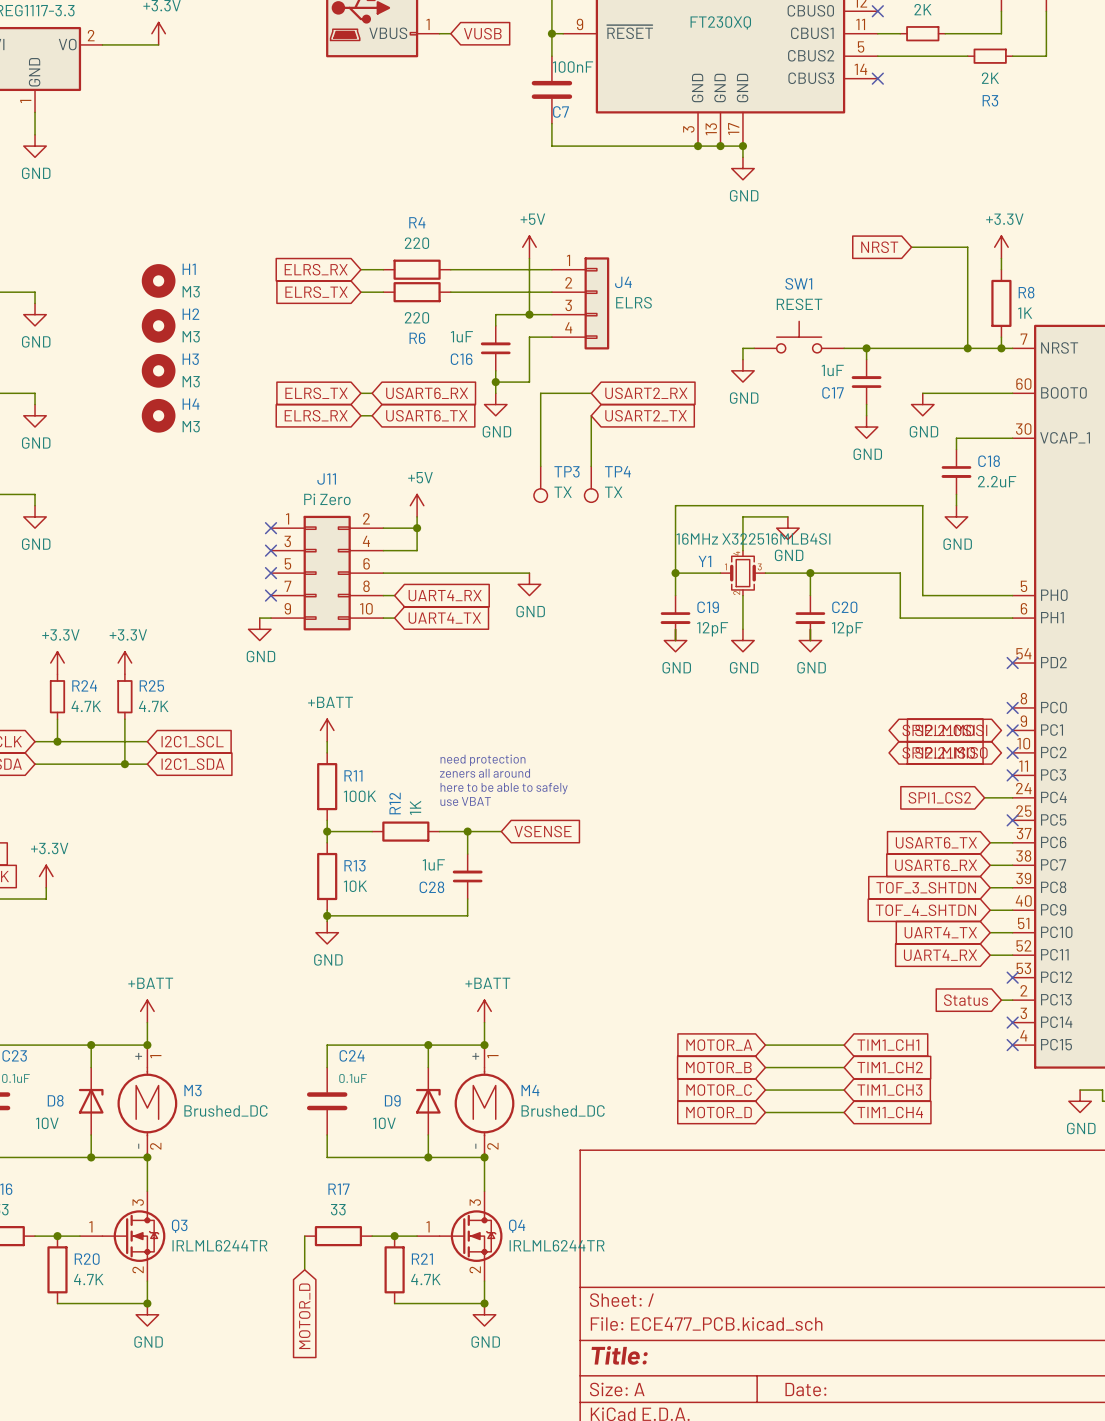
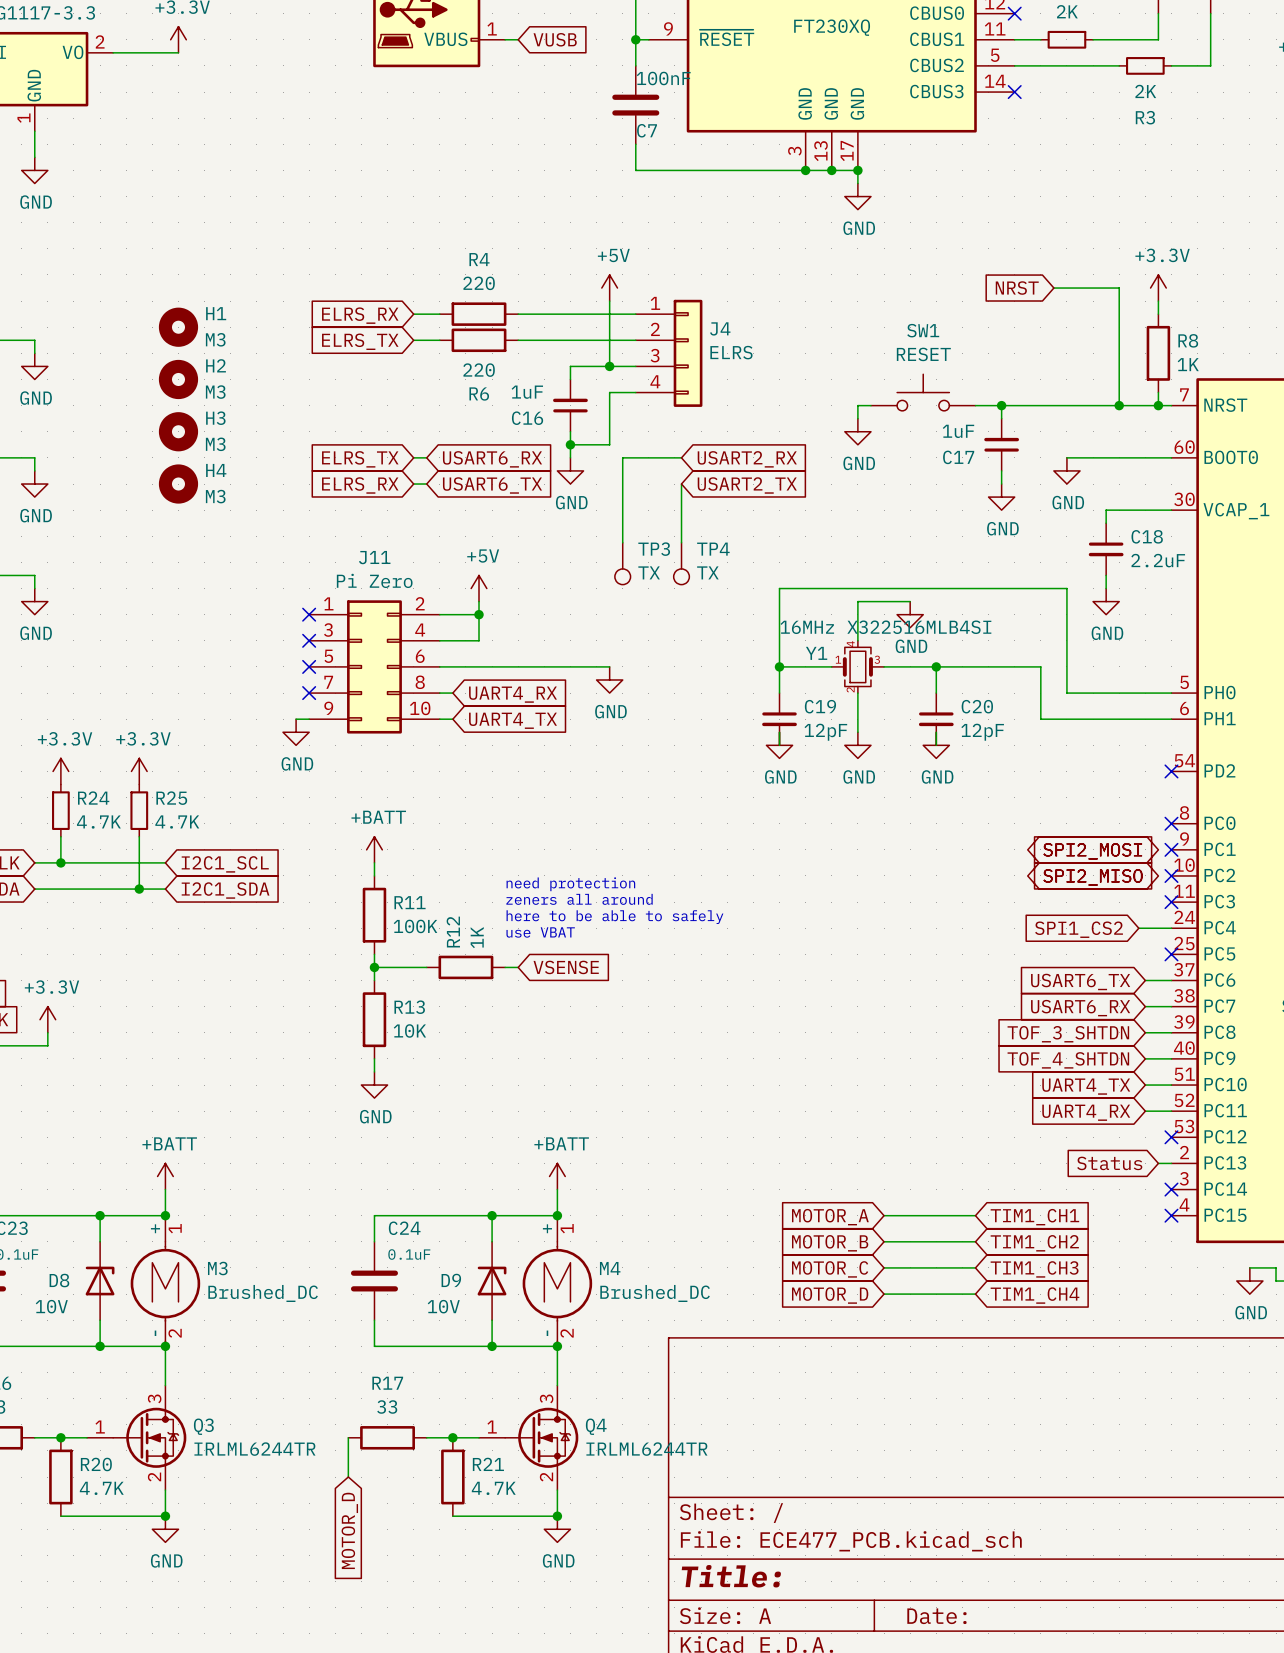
wire: (450, 831) (501, 831) -> none
wire: (467, 831) (467, 854) -> none
junction: (467, 831) -> none
global label position: VSENSE (543, 831) -> VSENSE (566, 967)
C28: 1uF (467, 876) -> none
wire: (467, 898) (467, 915) (327, 915) -> none
junction: (327, 915) -> none

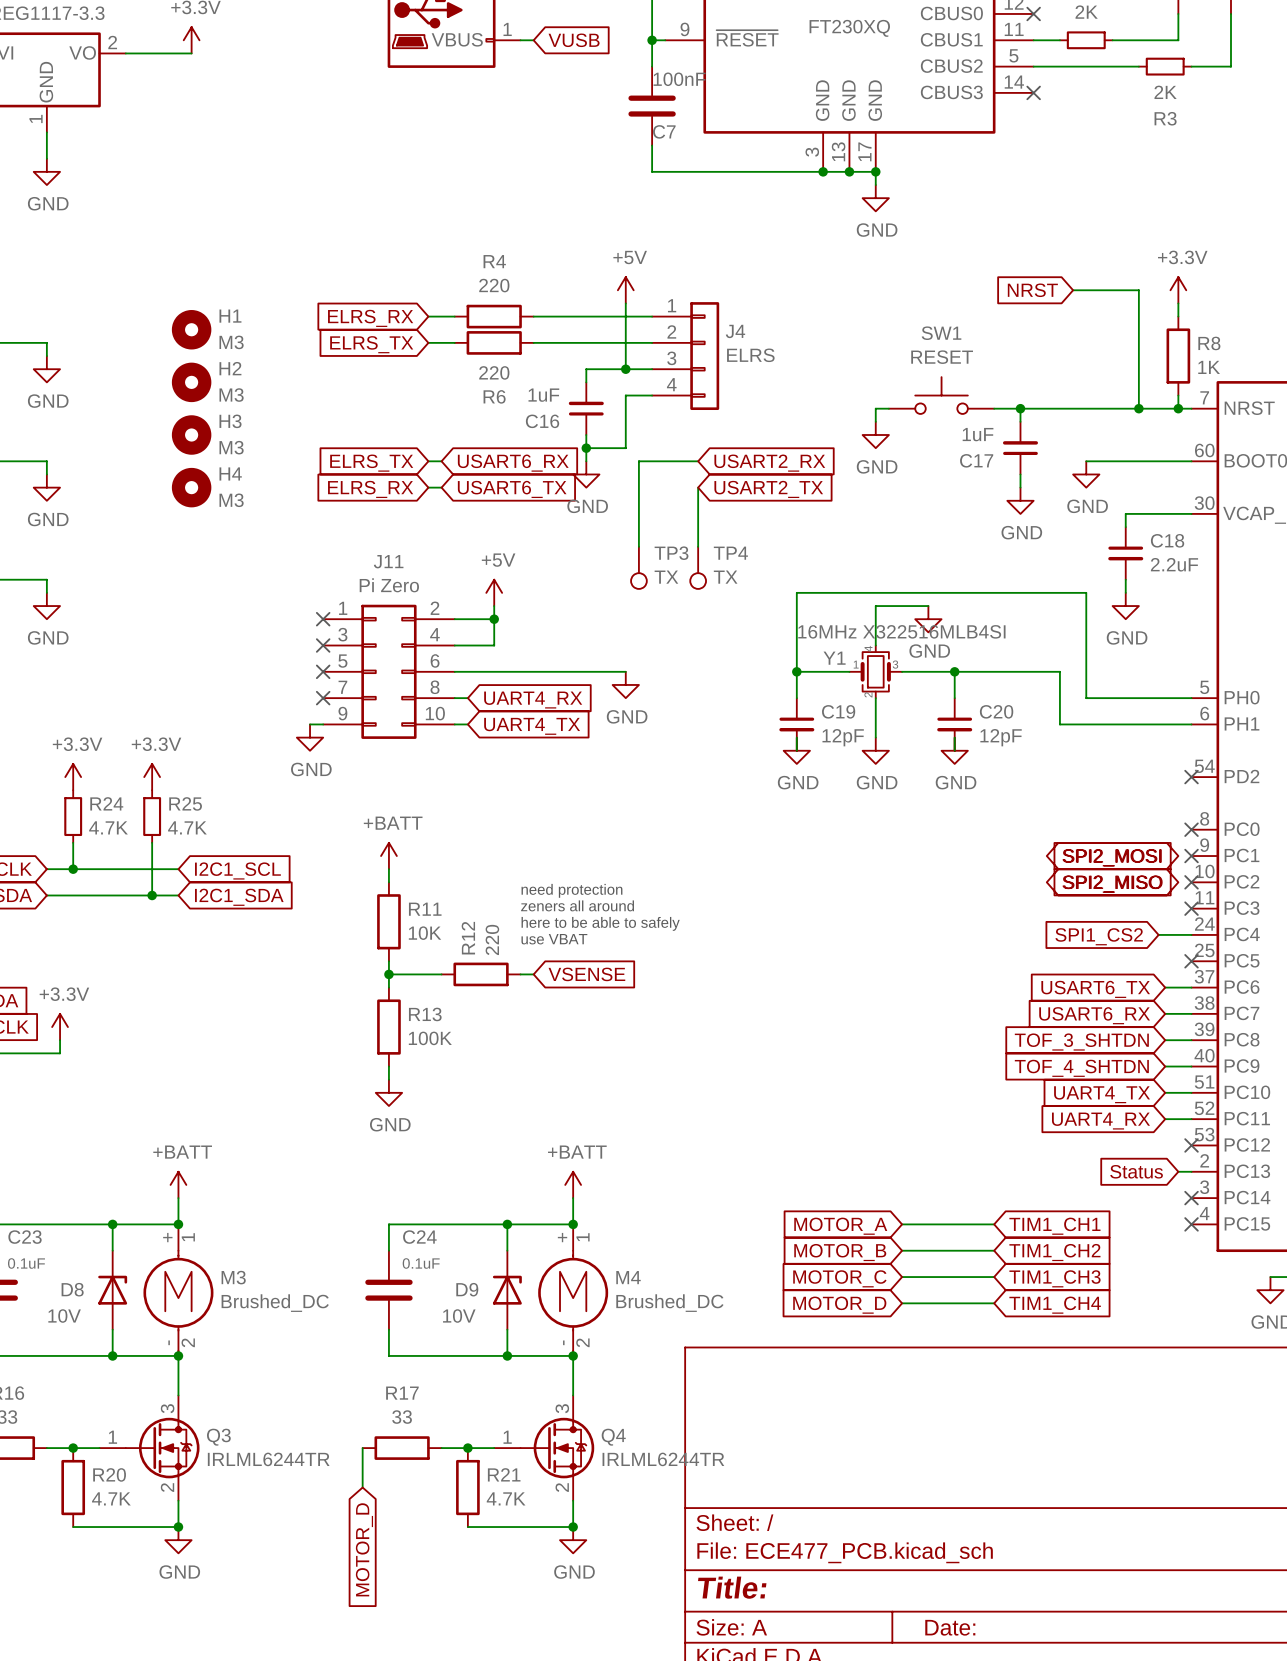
R11 value: 100K (415, 926) -> 10K (425, 933)
R12 value: 1K (477, 937) -> 220 (492, 939)
R13 value: 10K (409, 1030) -> 100K (430, 1038)

